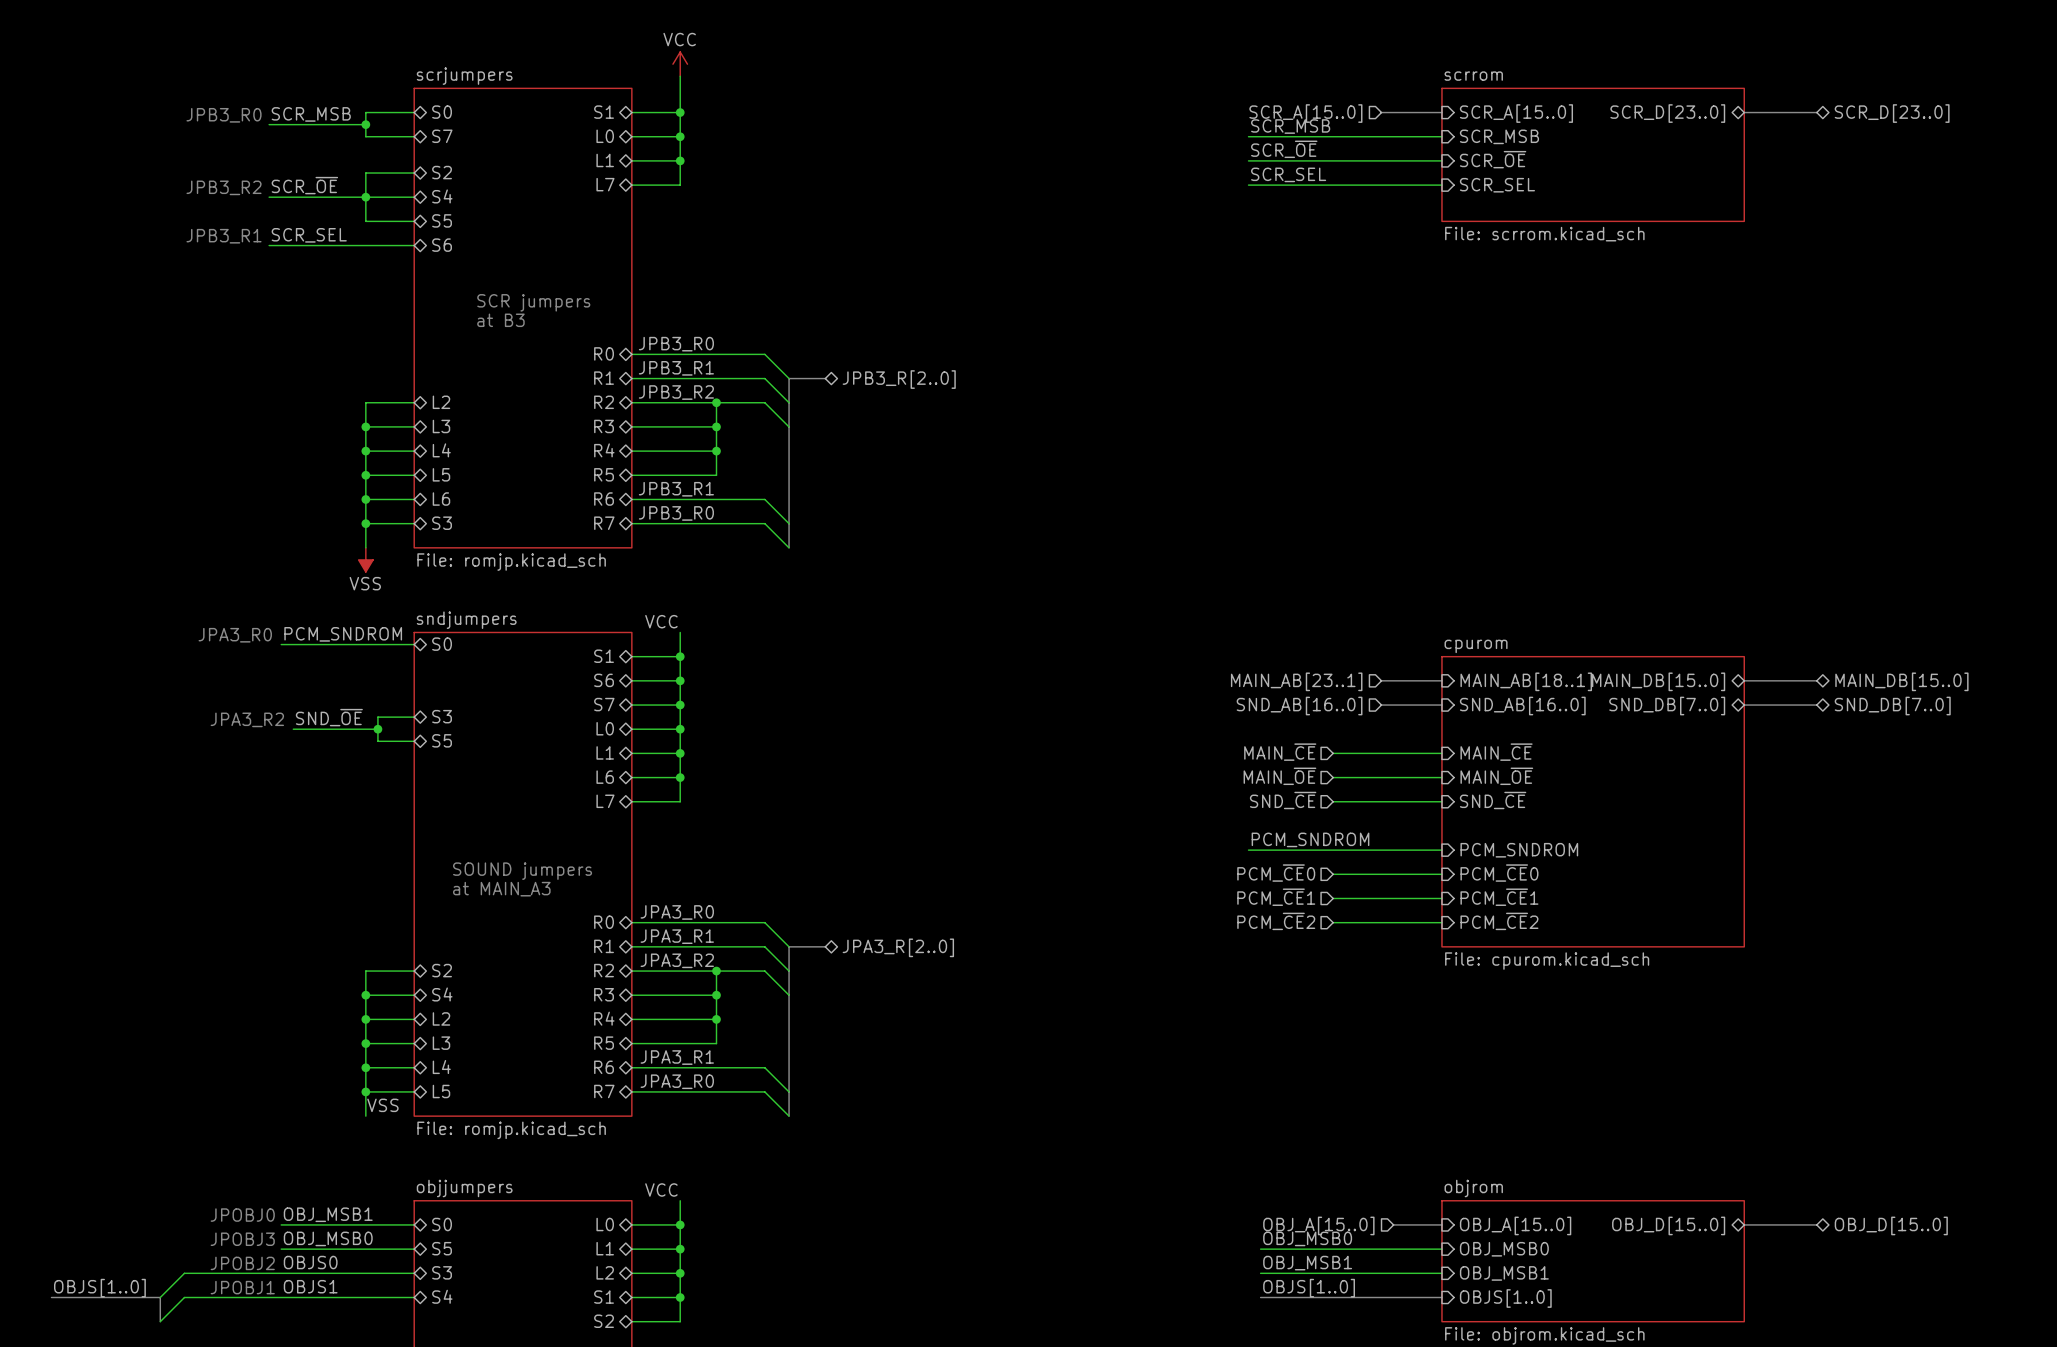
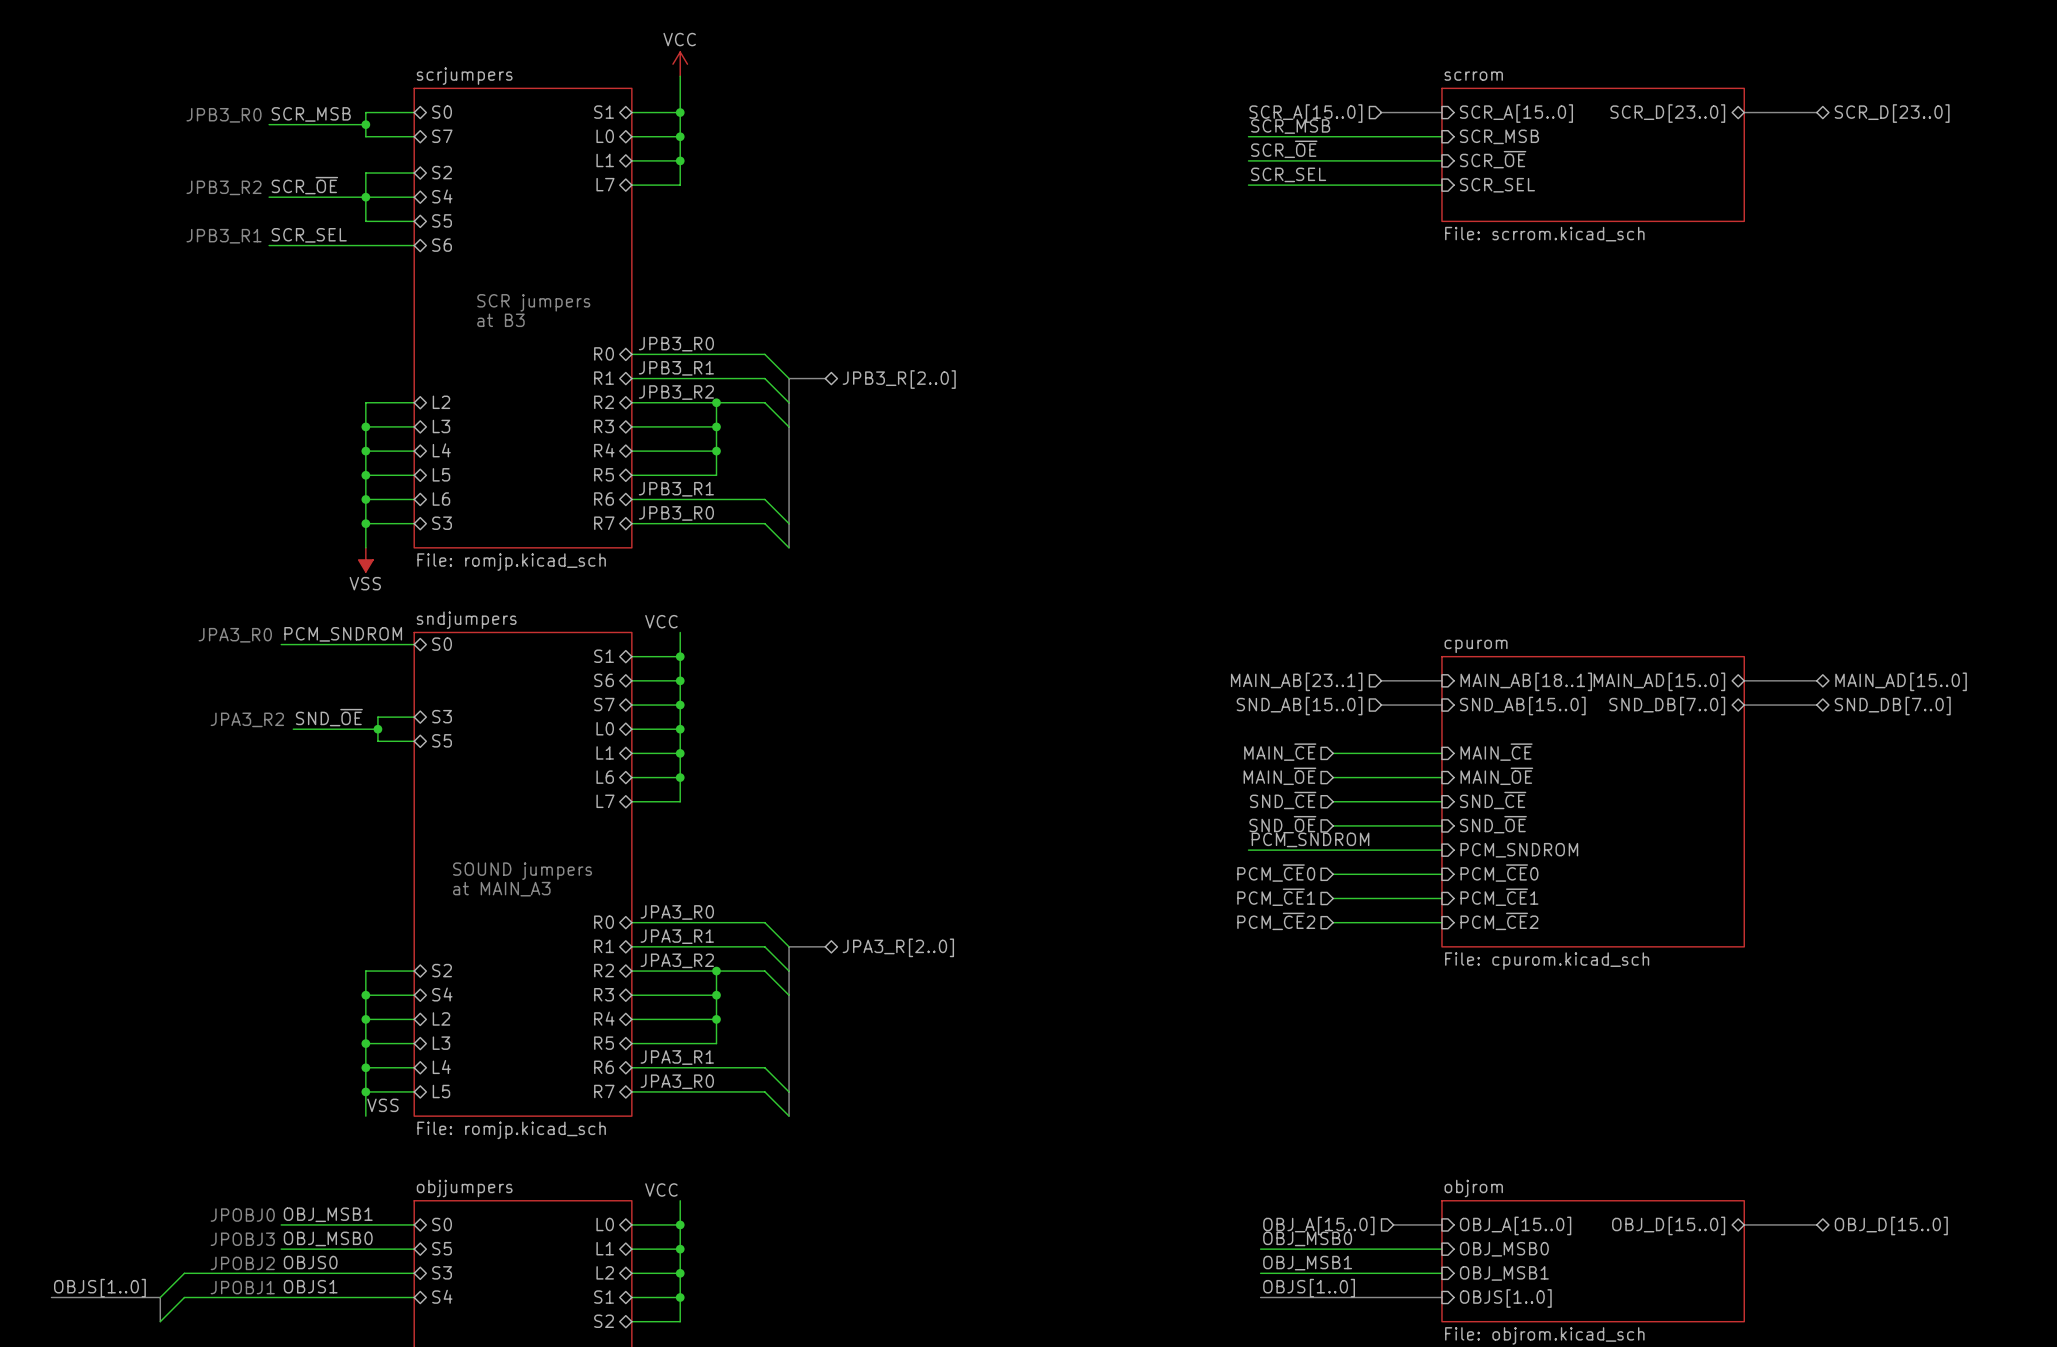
sheet pin: MAIN_DB[15..0] (1658, 681) -> MAIN_AD[15..0] (1659, 681)
hierarchical label: MAIN_DB[15..0] (1901, 681) -> MAIN_AD[15..0] (1901, 681)
hierarchical label: SND_AB[16..0] (1299, 706) -> SND_AB[15..0] (1299, 706)
sheet pin: SND_AB[16..0] (1522, 706) -> SND_AB[15..0] (1522, 706)
hierarchical label: none -> SND_~{OE} (1282, 824)
sheet pin: none -> SND_~{OE} (1493, 824)
wire: none -> (1333, 825) (1441, 825)

